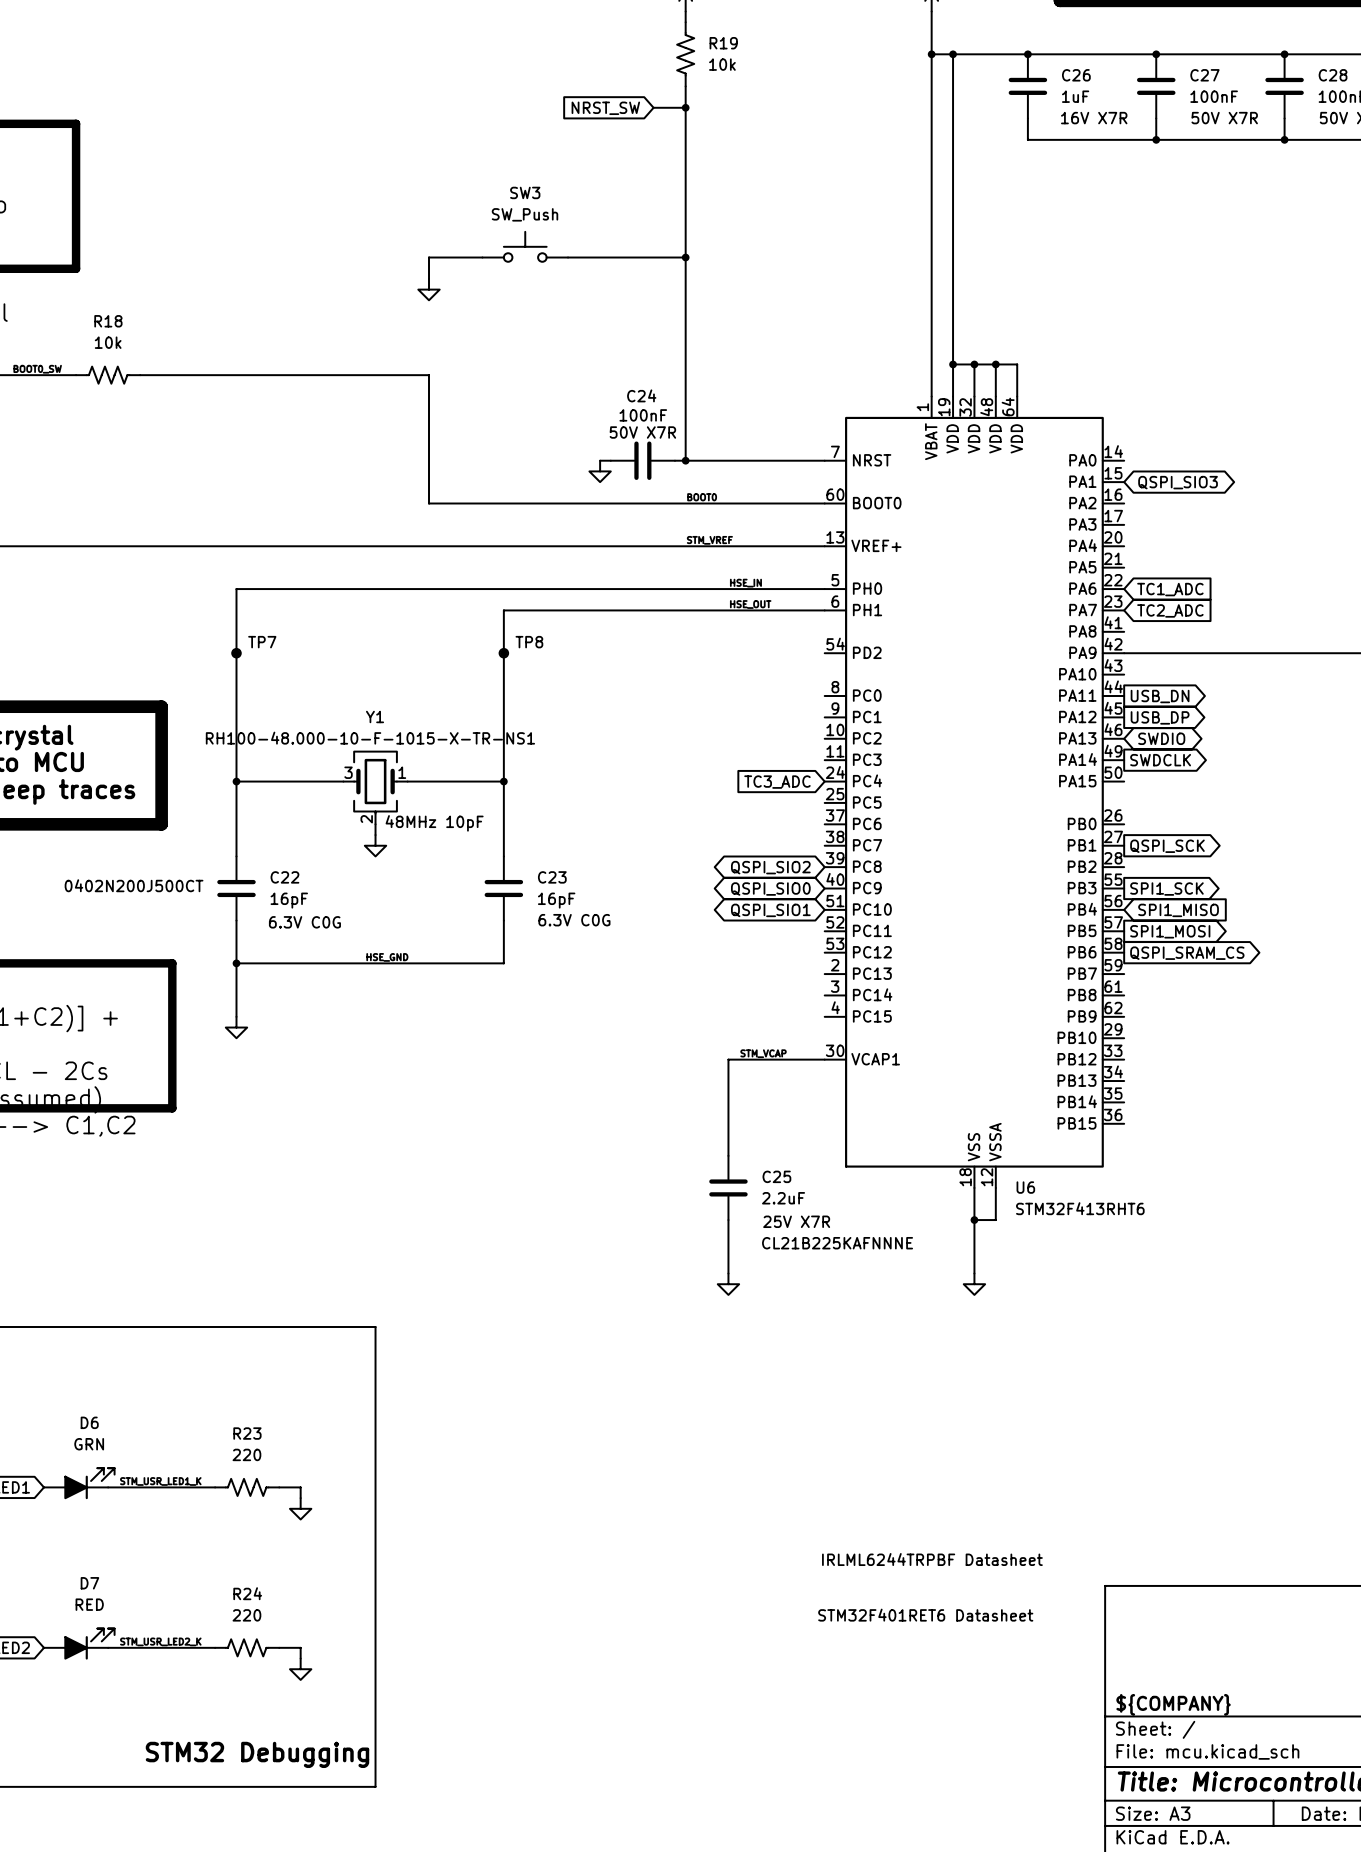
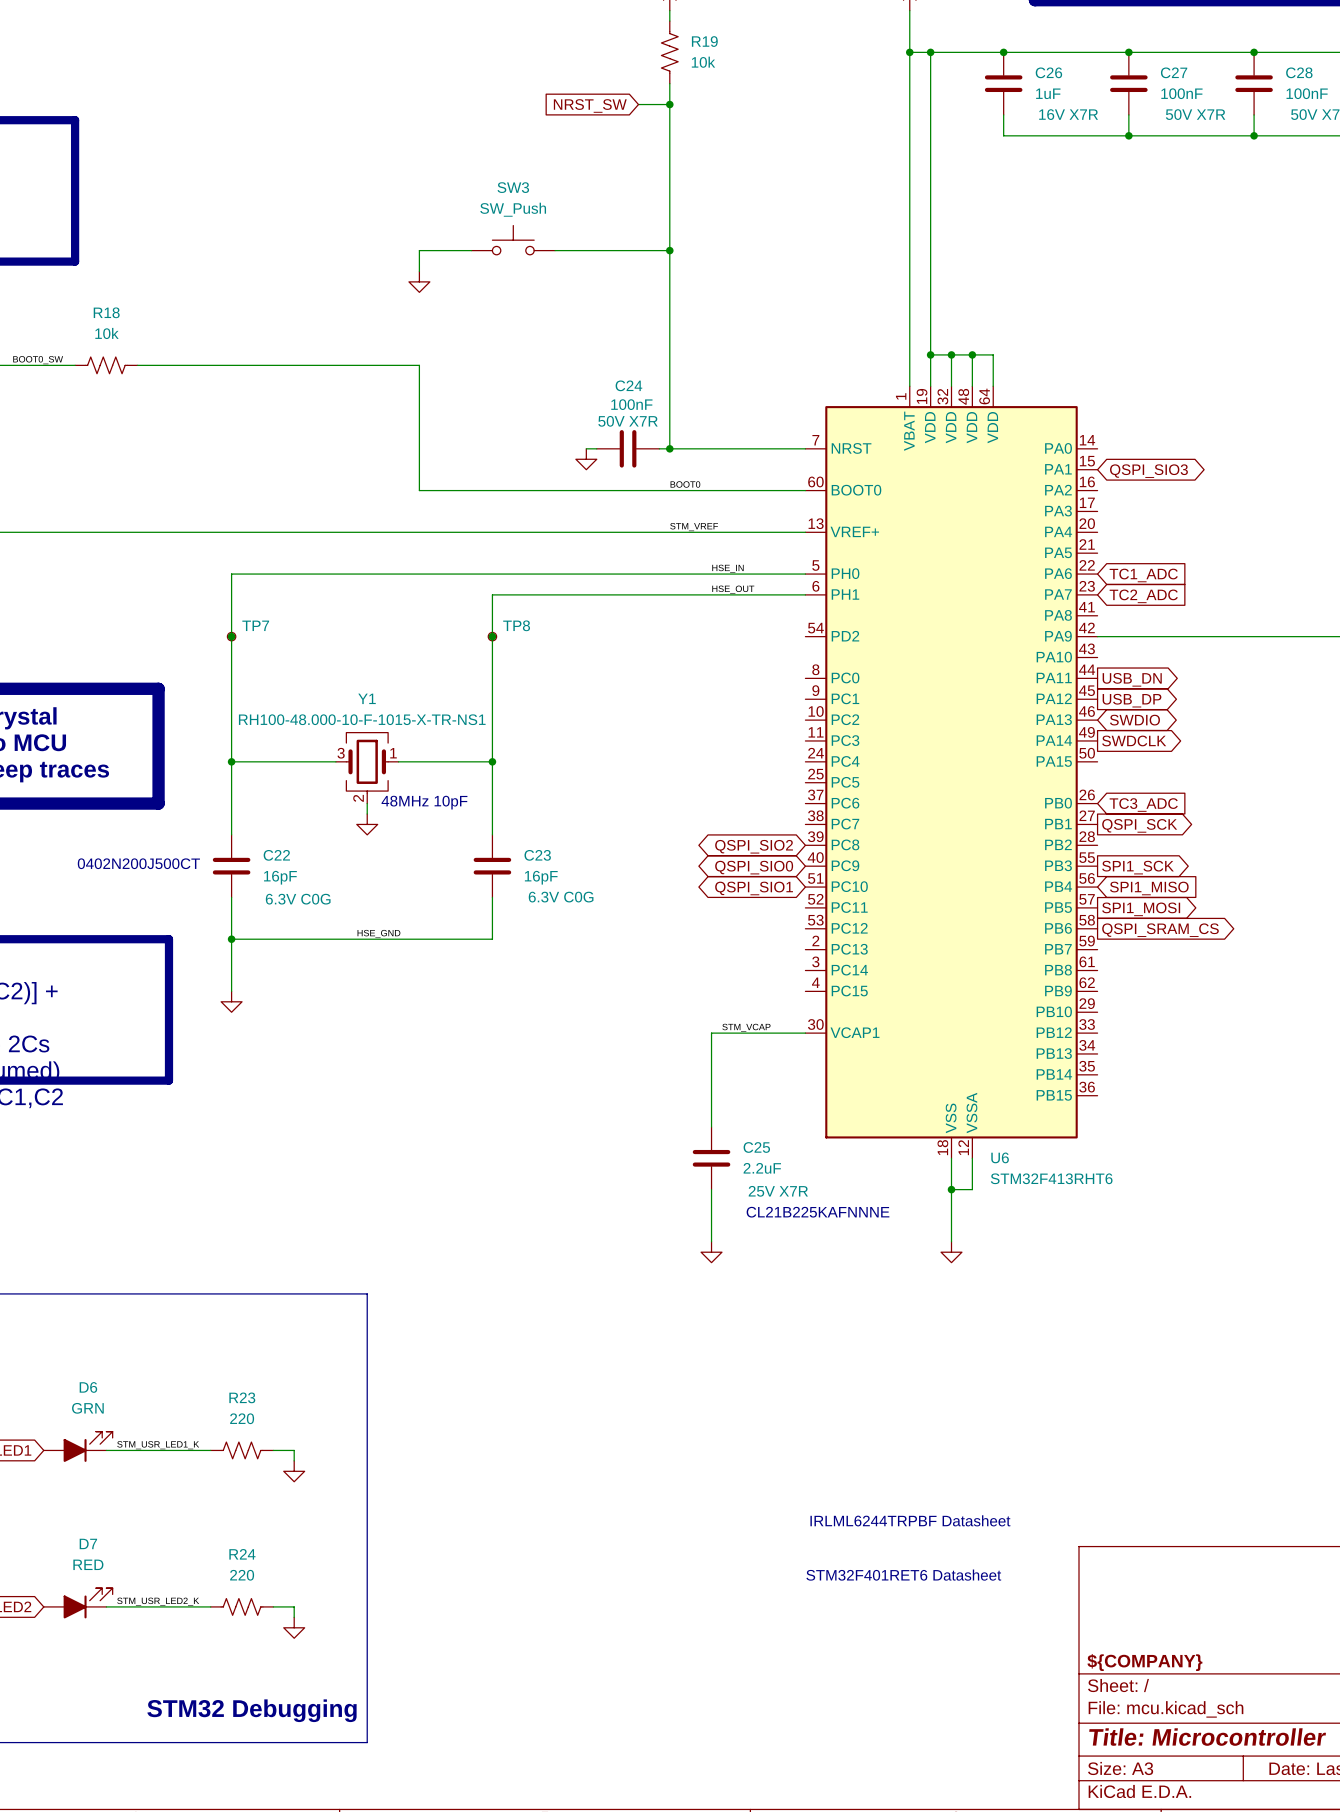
global label: TC3_ADC (777, 782) -> none
global label: none -> TC3_ADC (1143, 805)

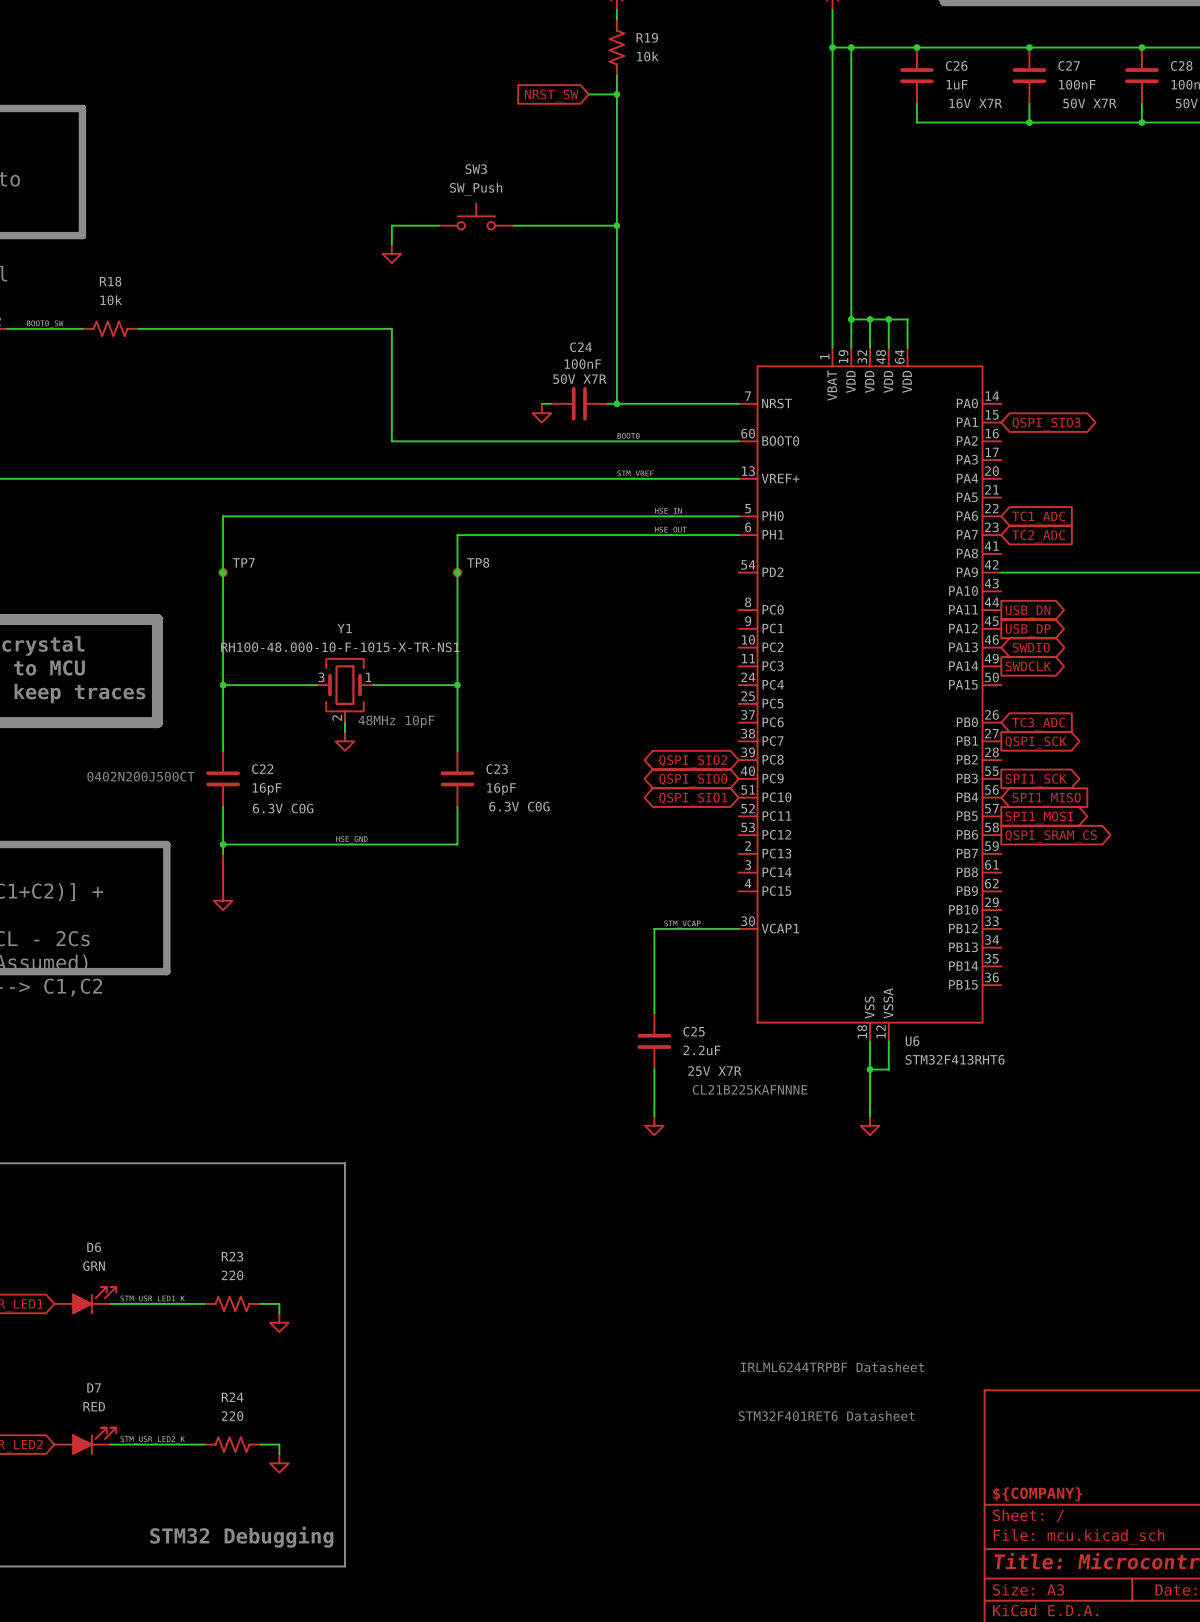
part: none -> (223, 872)

